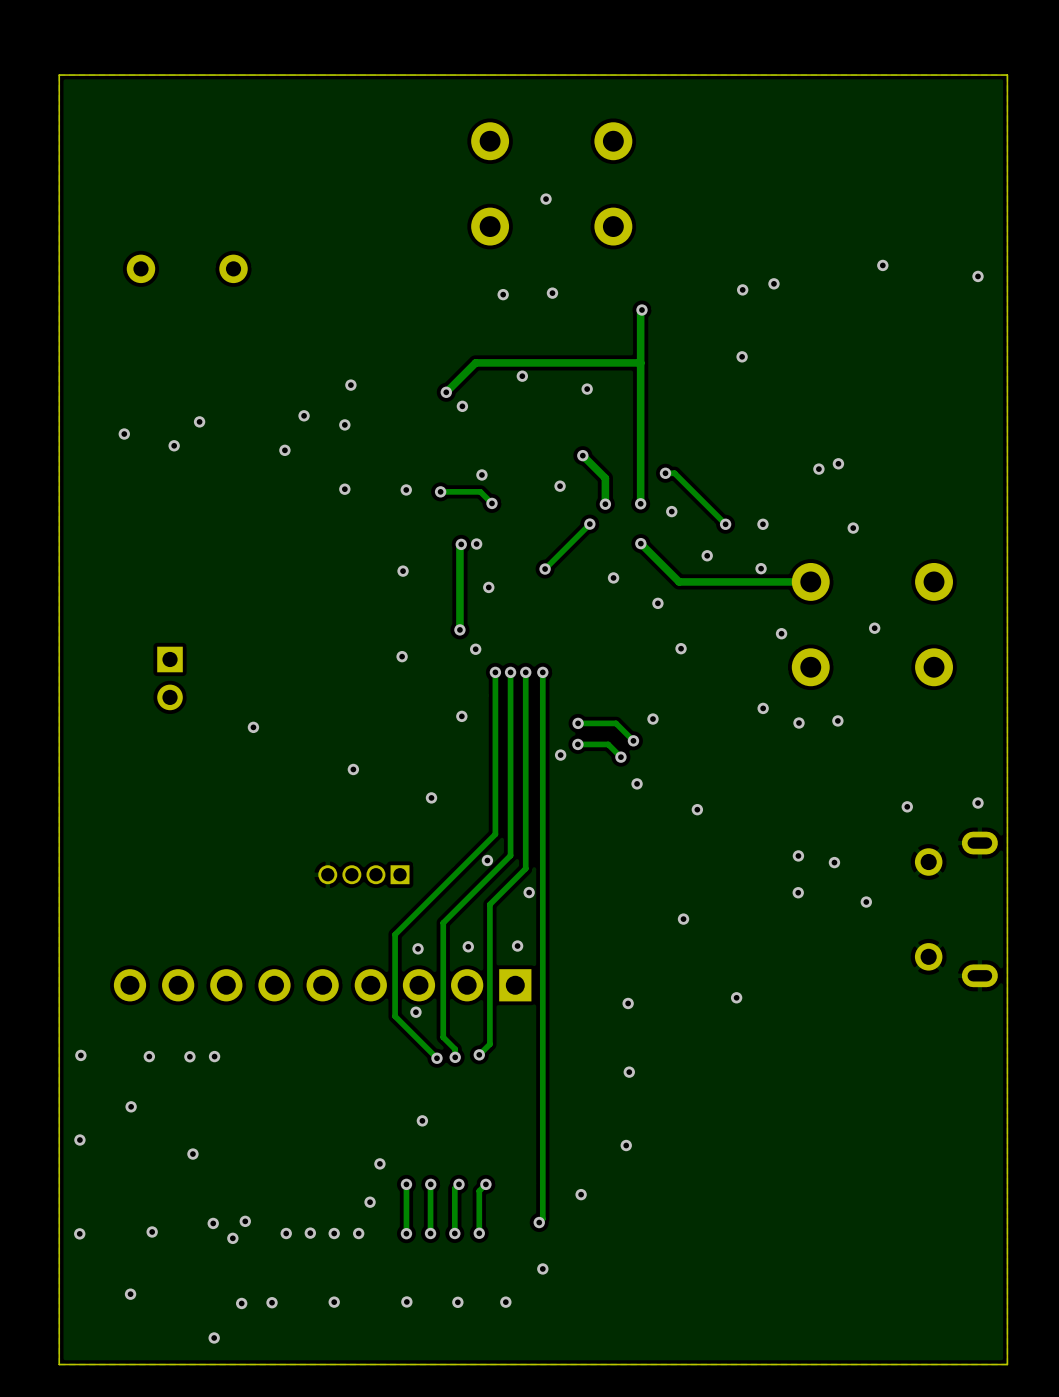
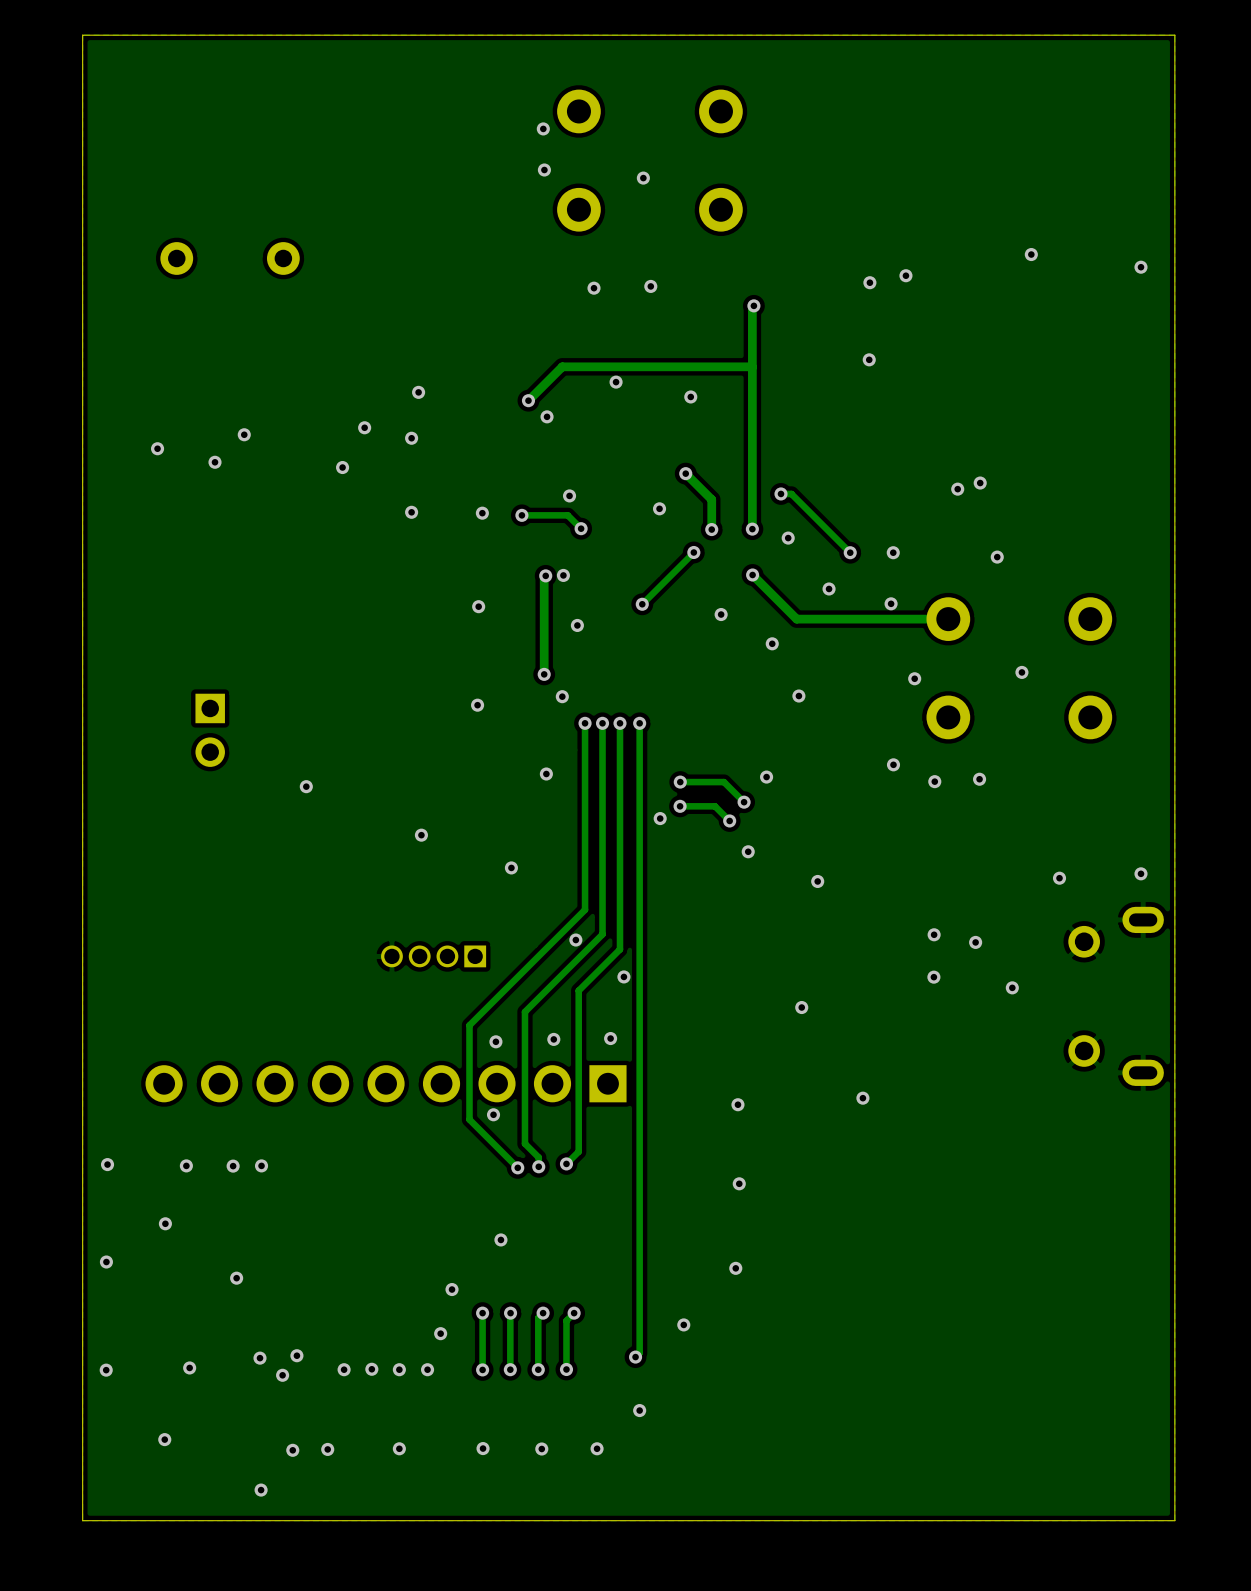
via: none -> (543, 128)
via: none -> (544, 170)

